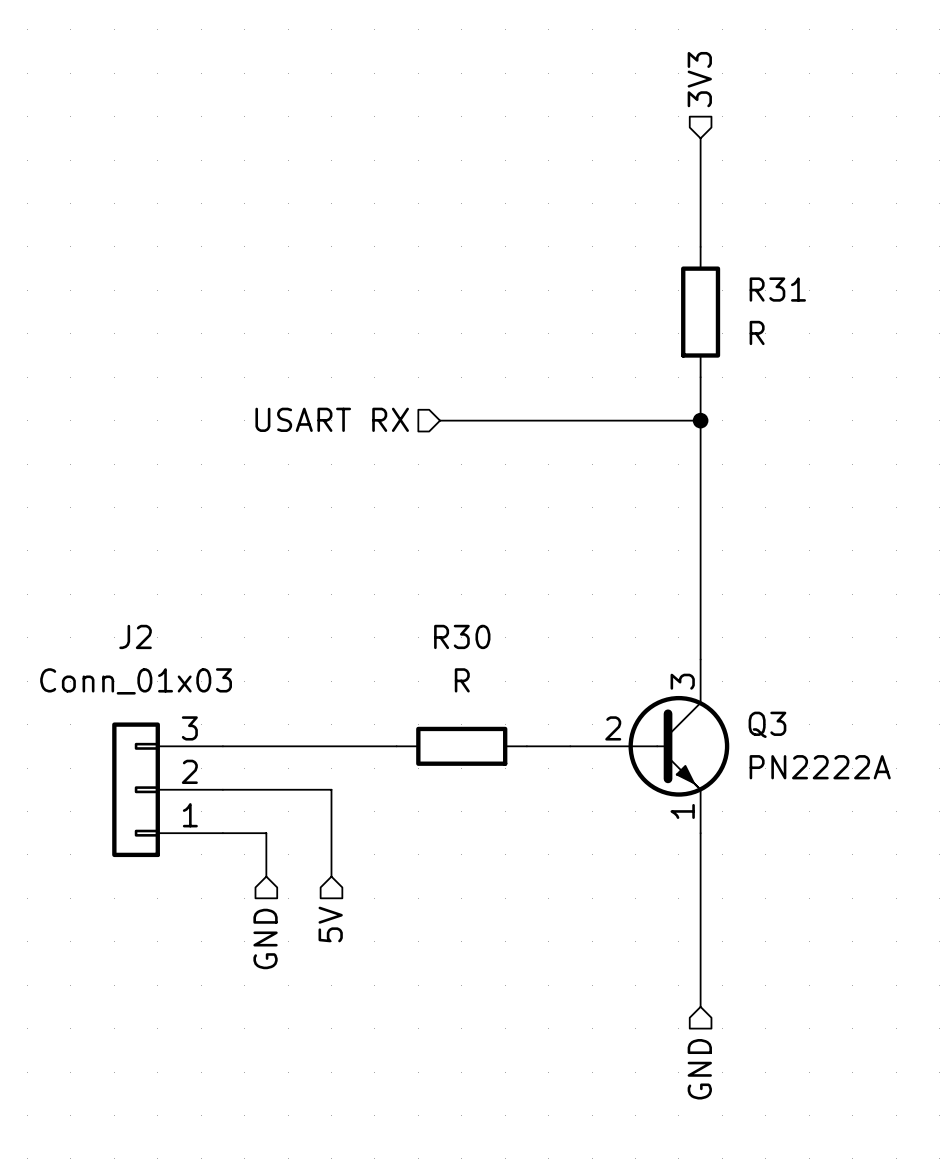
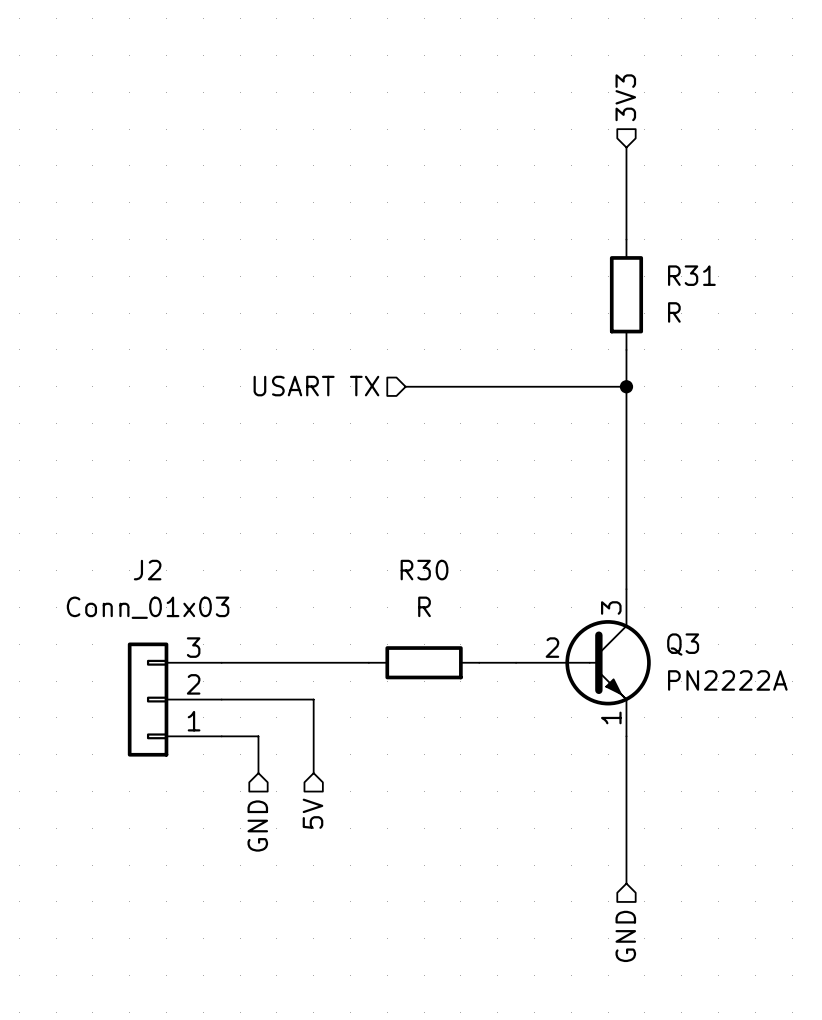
hierarchical label: USART RX (332, 419) -> USART TX (316, 386)

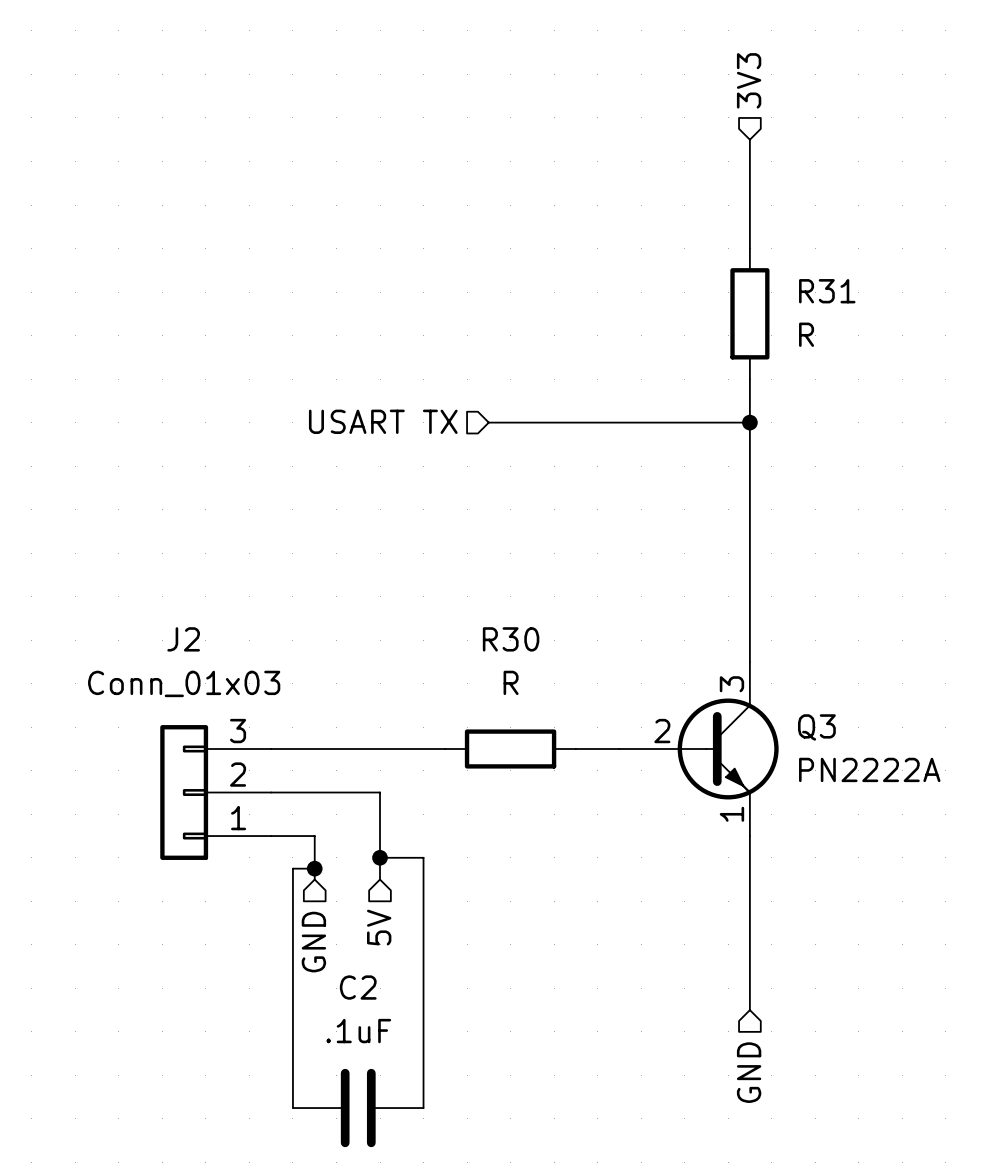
wire: none -> (380, 857) (423, 857) (423, 1108)
junction: none -> (380, 857)
wire: none -> (314, 868) (292, 868) (292, 1108)
junction: none -> (314, 868)
C2: none -> .1uF (358, 1108)

